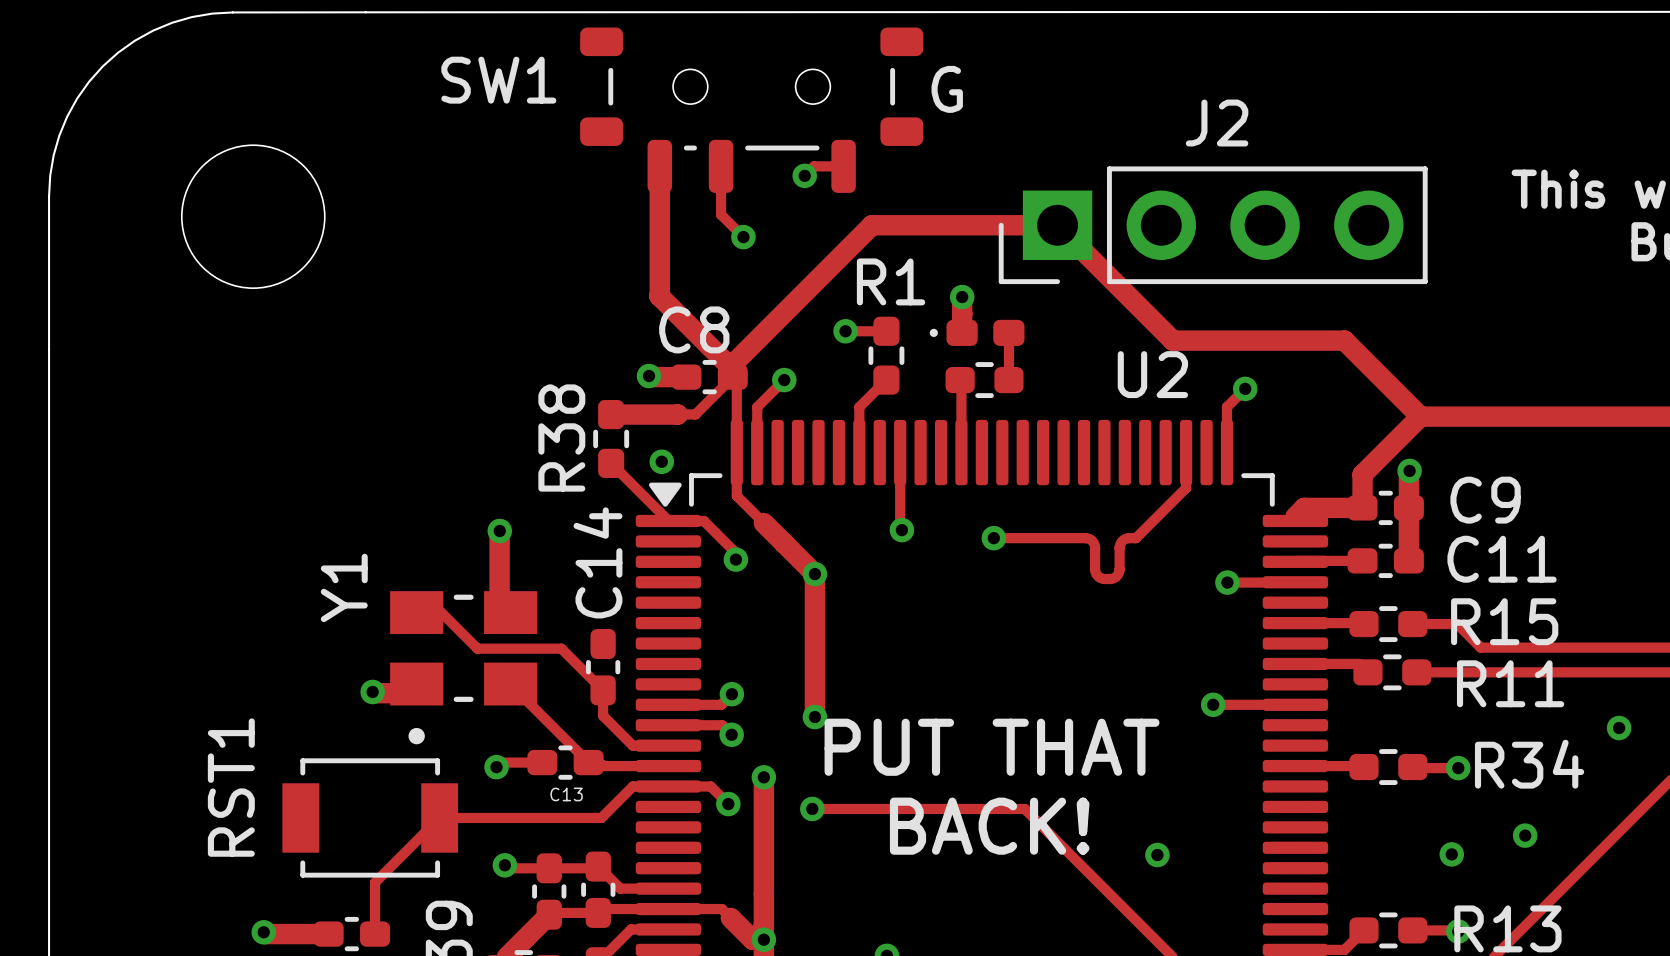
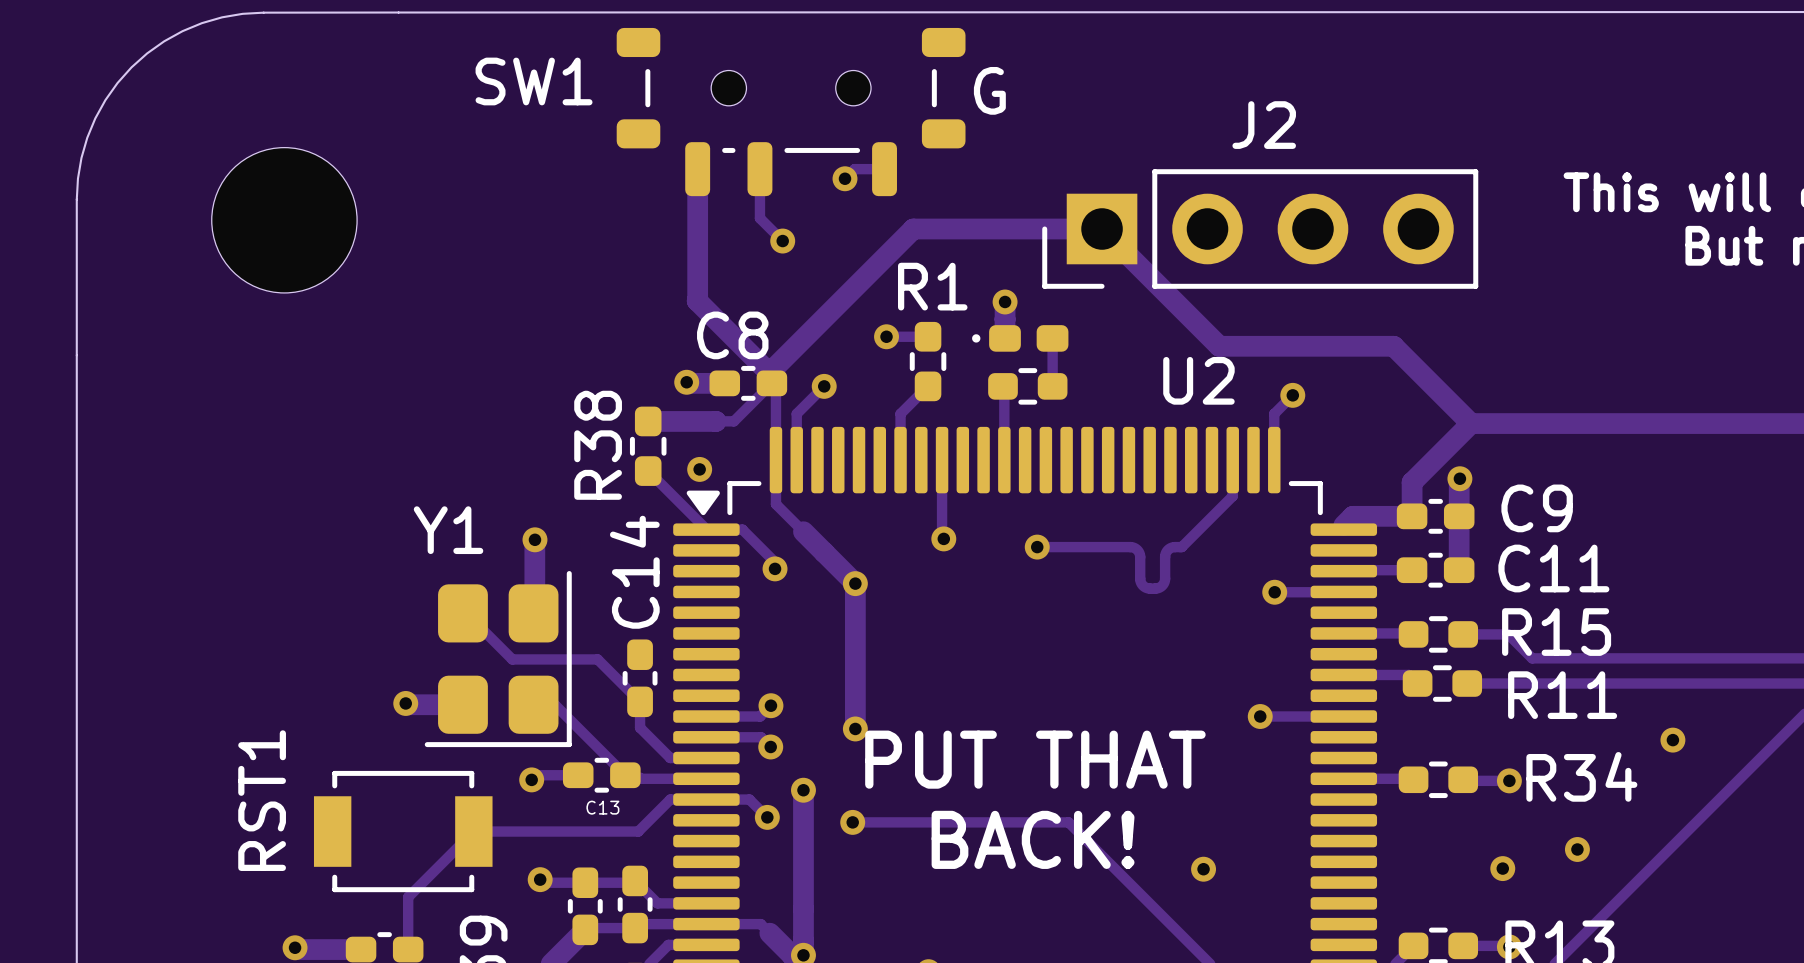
Y1 name position: Y1 (344, 587) -> Y1 (448, 530)
Y1 footprint: [390, 591, 538, 745] -> [424, 571, 572, 748]

